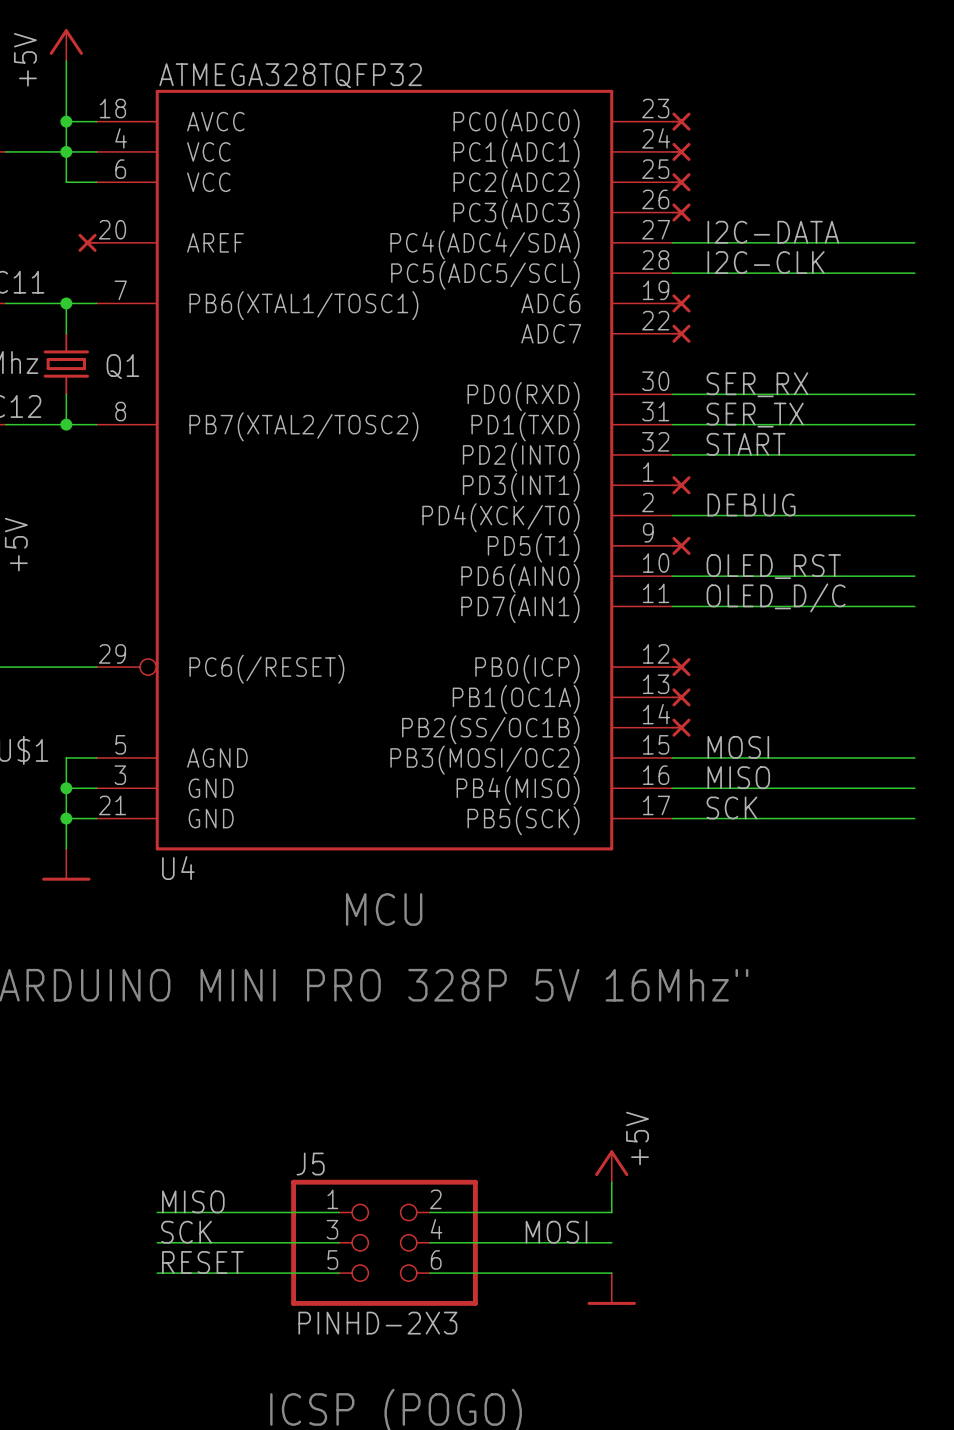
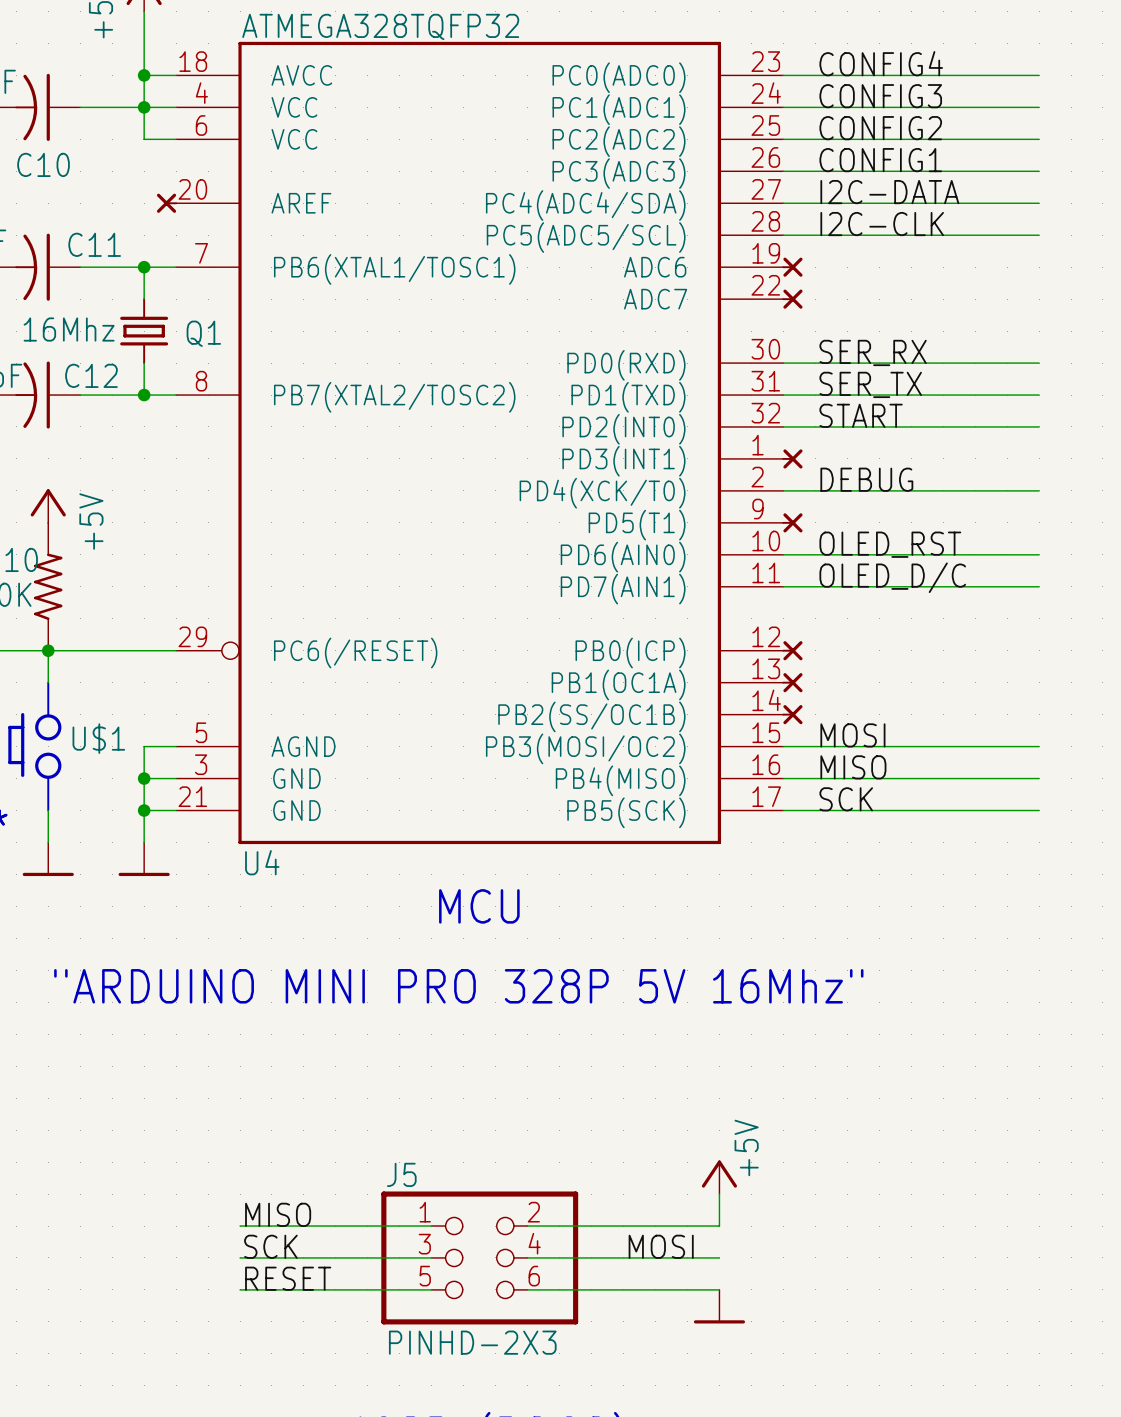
label: none -> CONFIG4 (881, 63)
wire: none -> (783, 75) (1039, 75)
part: (681, 121) -> none
label: none -> CONFIG3 (880, 96)
wire: none -> (783, 107) (1039, 107)
part: (681, 151) -> none
label: none -> CONFIG2 (880, 128)
wire: none -> (783, 139) (1039, 139)
part: (681, 182) -> none
label: none -> CONFIG1 (880, 160)
wire: none -> (783, 171) (1039, 171)
part: (681, 212) -> none

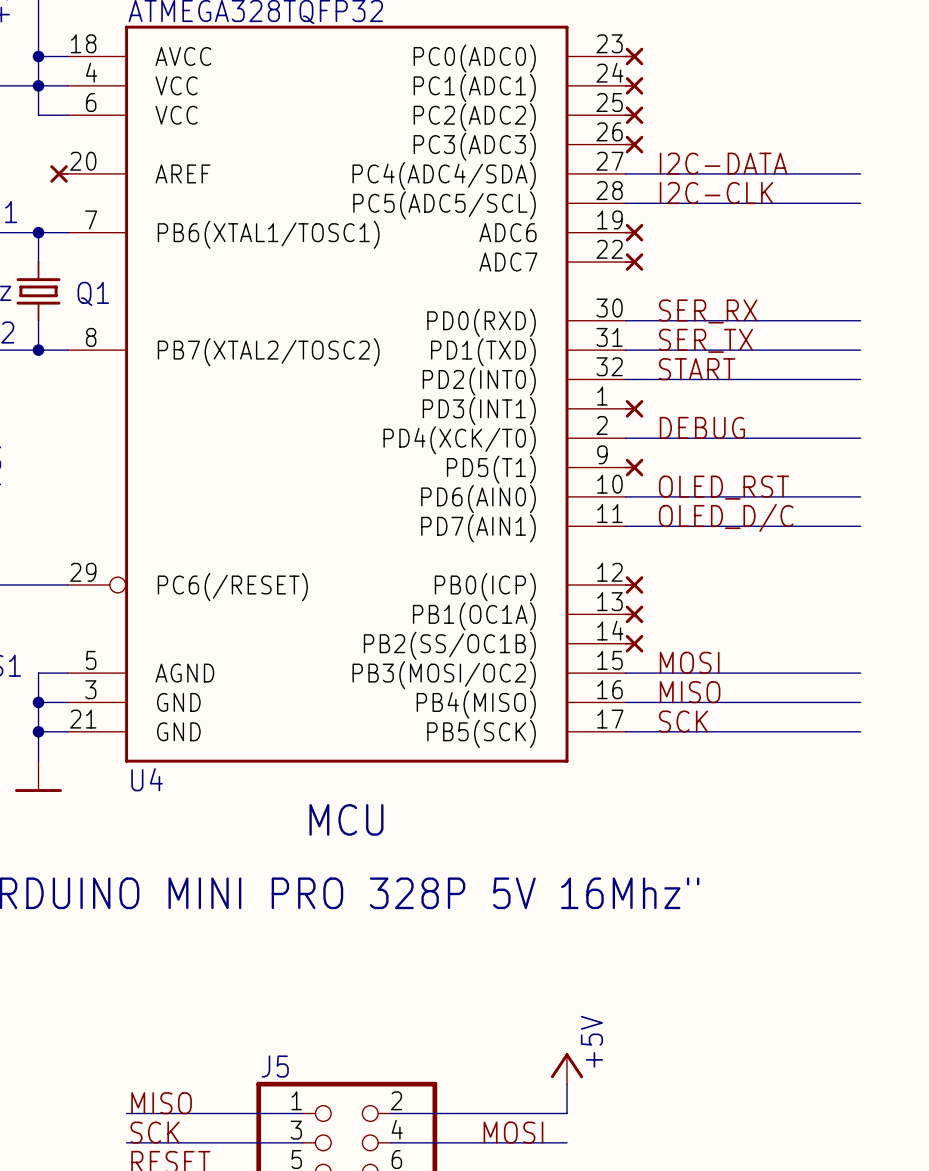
label: CONFIG4 (881, 63) -> none
wire: (783, 75) (1039, 75) -> none
part: none -> (634, 56)
label: CONFIG3 (880, 96) -> none
wire: (783, 107) (1039, 107) -> none
part: none -> (634, 85)
label: CONFIG2 (880, 128) -> none
wire: (783, 139) (1039, 139) -> none
part: none -> (634, 115)
label: CONFIG1 (880, 160) -> none
wire: (783, 171) (1039, 171) -> none
part: none -> (634, 144)

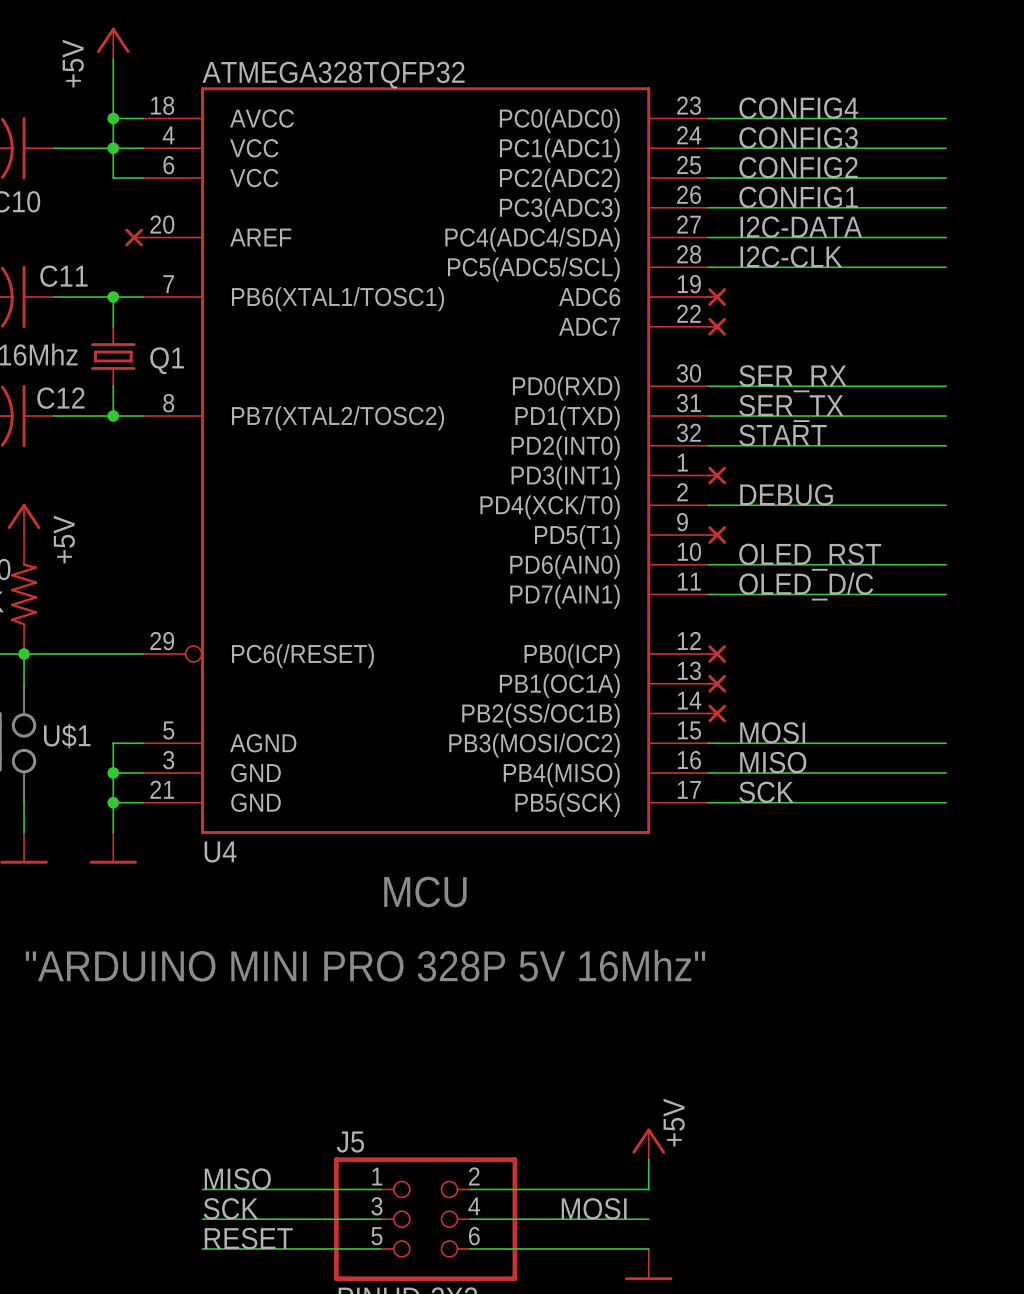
label: none -> CONFIG4 (798, 108)
wire: none -> (708, 118) (946, 118)
part: (634, 56) -> none
label: none -> CONFIG3 (798, 137)
wire: none -> (708, 148) (946, 148)
part: (634, 85) -> none
label: none -> CONFIG2 (798, 167)
wire: none -> (708, 178) (946, 178)
part: (634, 115) -> none
label: none -> CONFIG1 (798, 197)
wire: none -> (708, 207) (946, 207)
part: (634, 144) -> none

